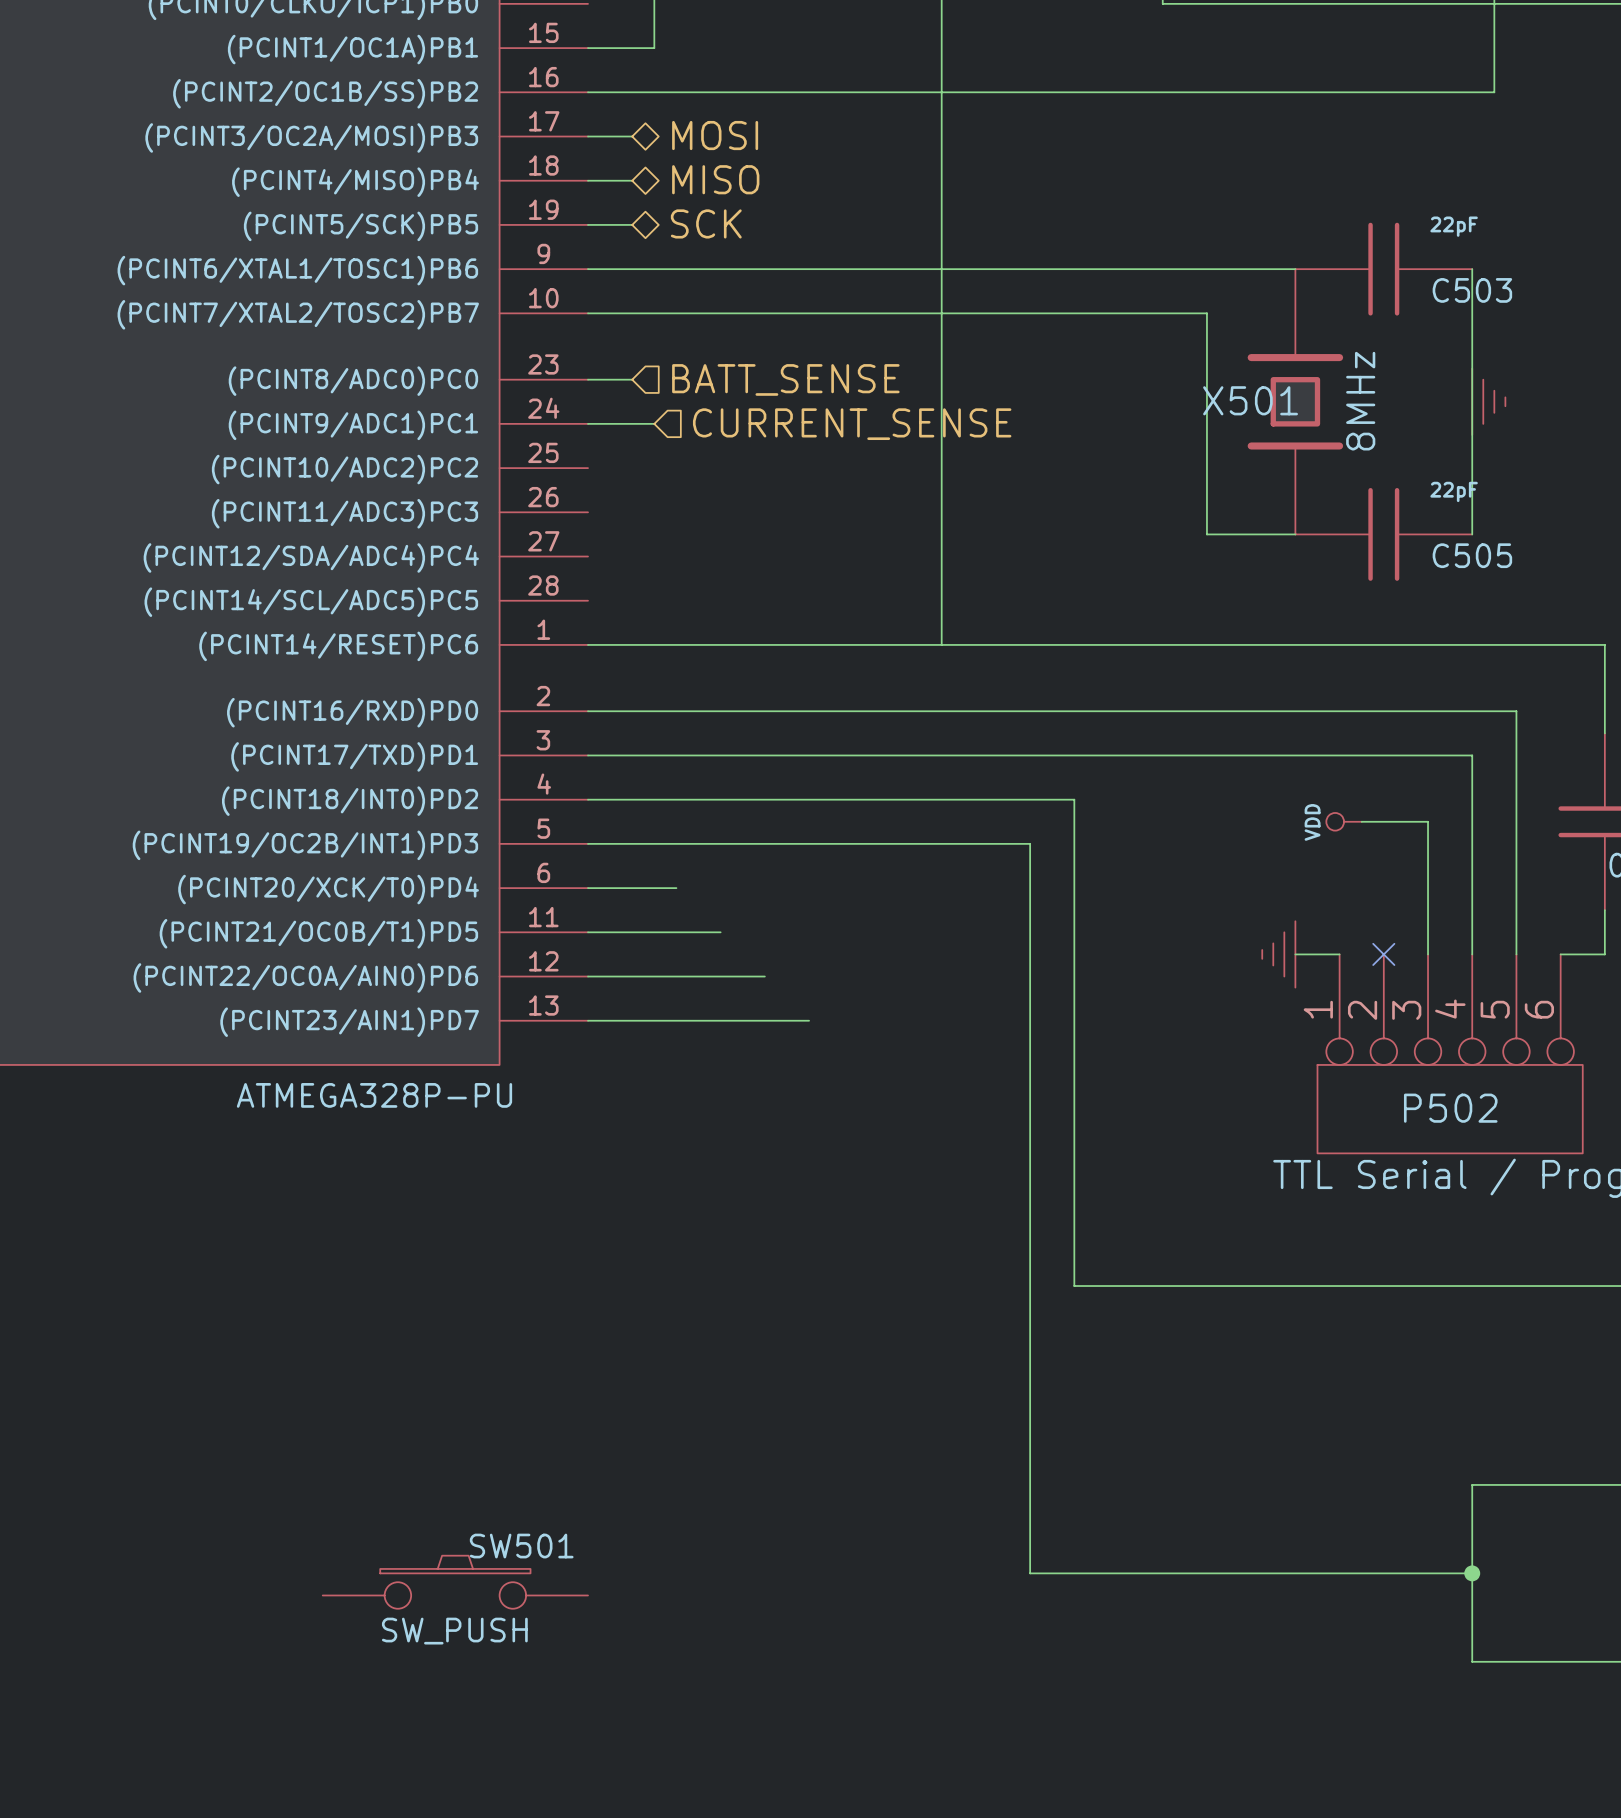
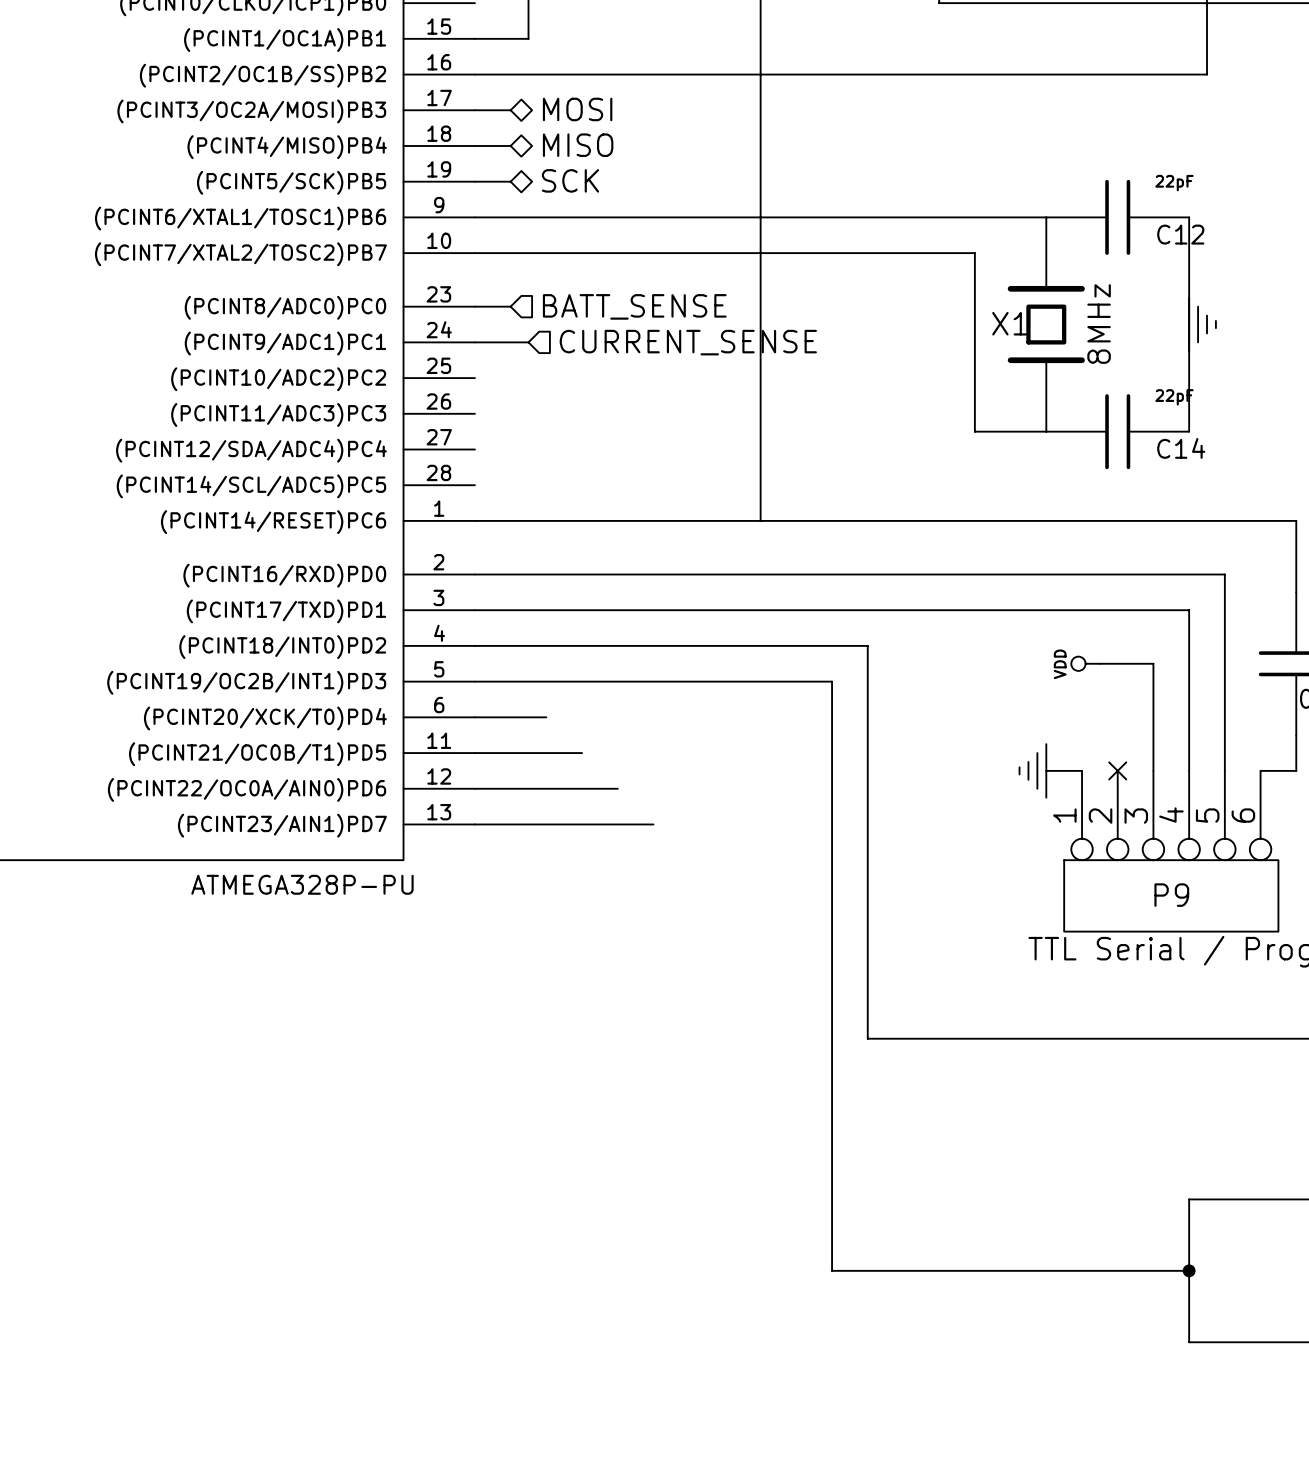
C503 name: C503 (1472, 290) -> C12 (1180, 234)
X501 name: X501 (1250, 400) -> X1 (1010, 323)
C505 name: C505 (1472, 555) -> C14 (1181, 448)
P502 name: P502 (1450, 1108) -> P9 (1171, 895)
SW501: SW_PUSH (455, 1582) -> none

